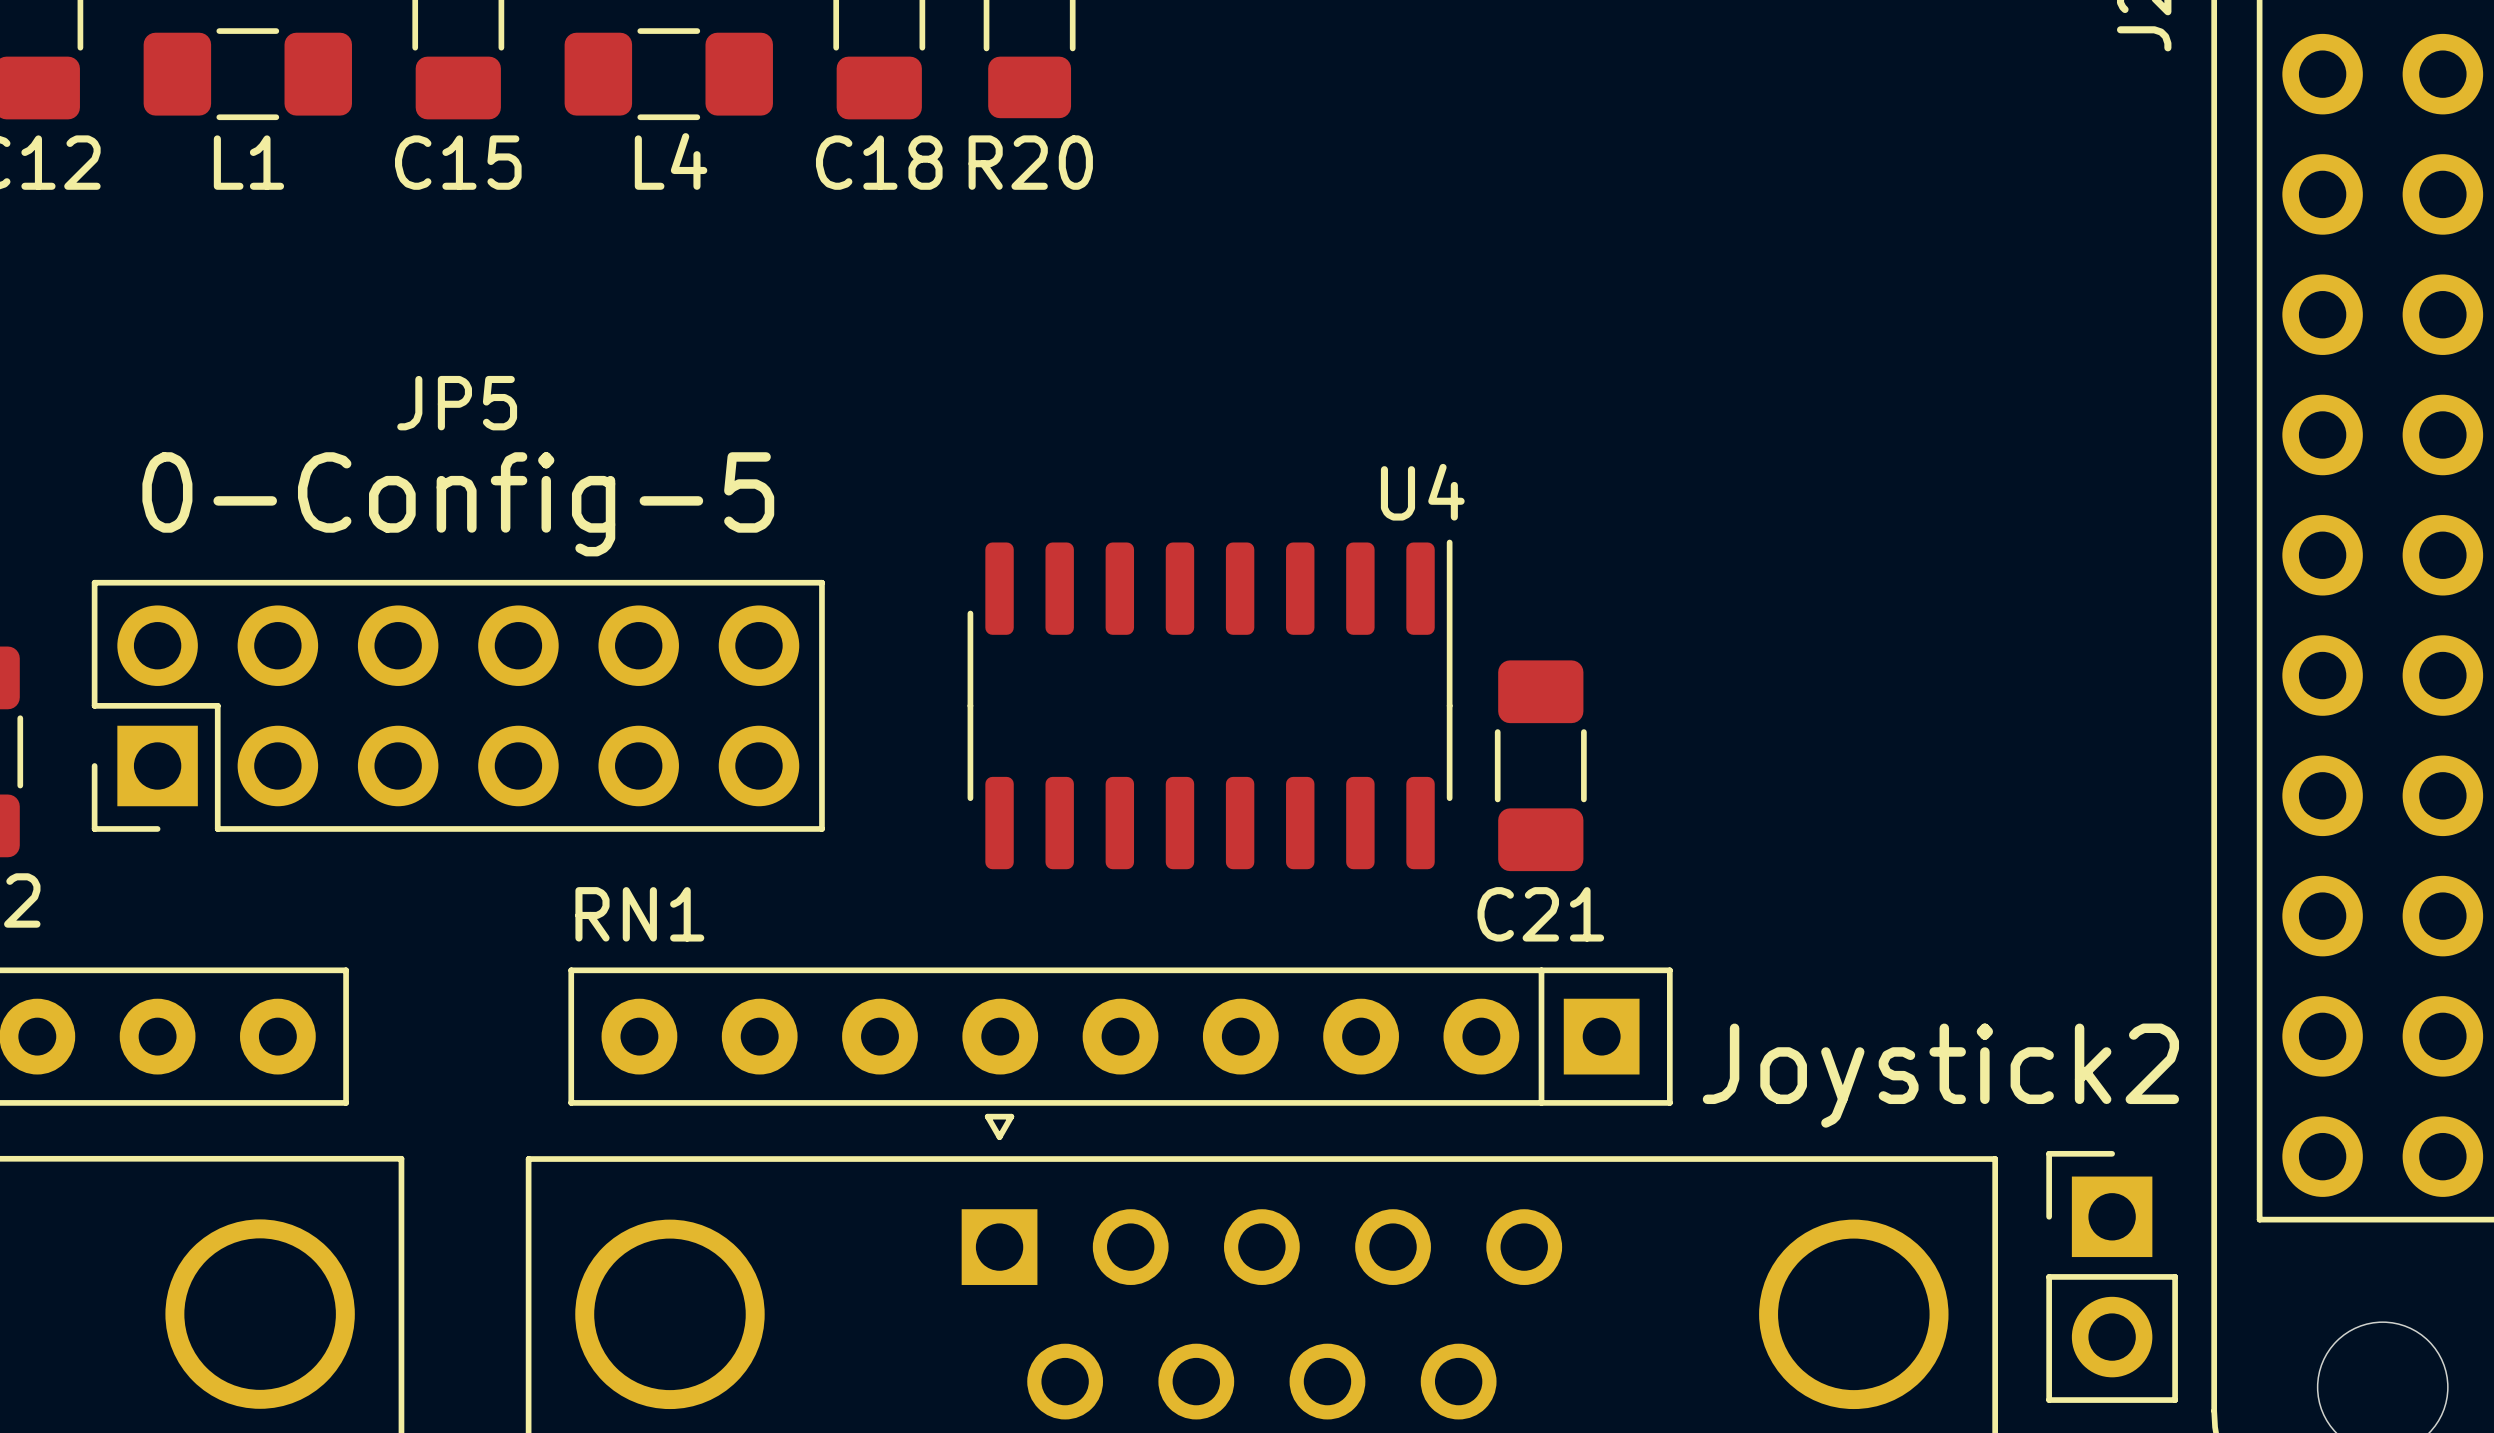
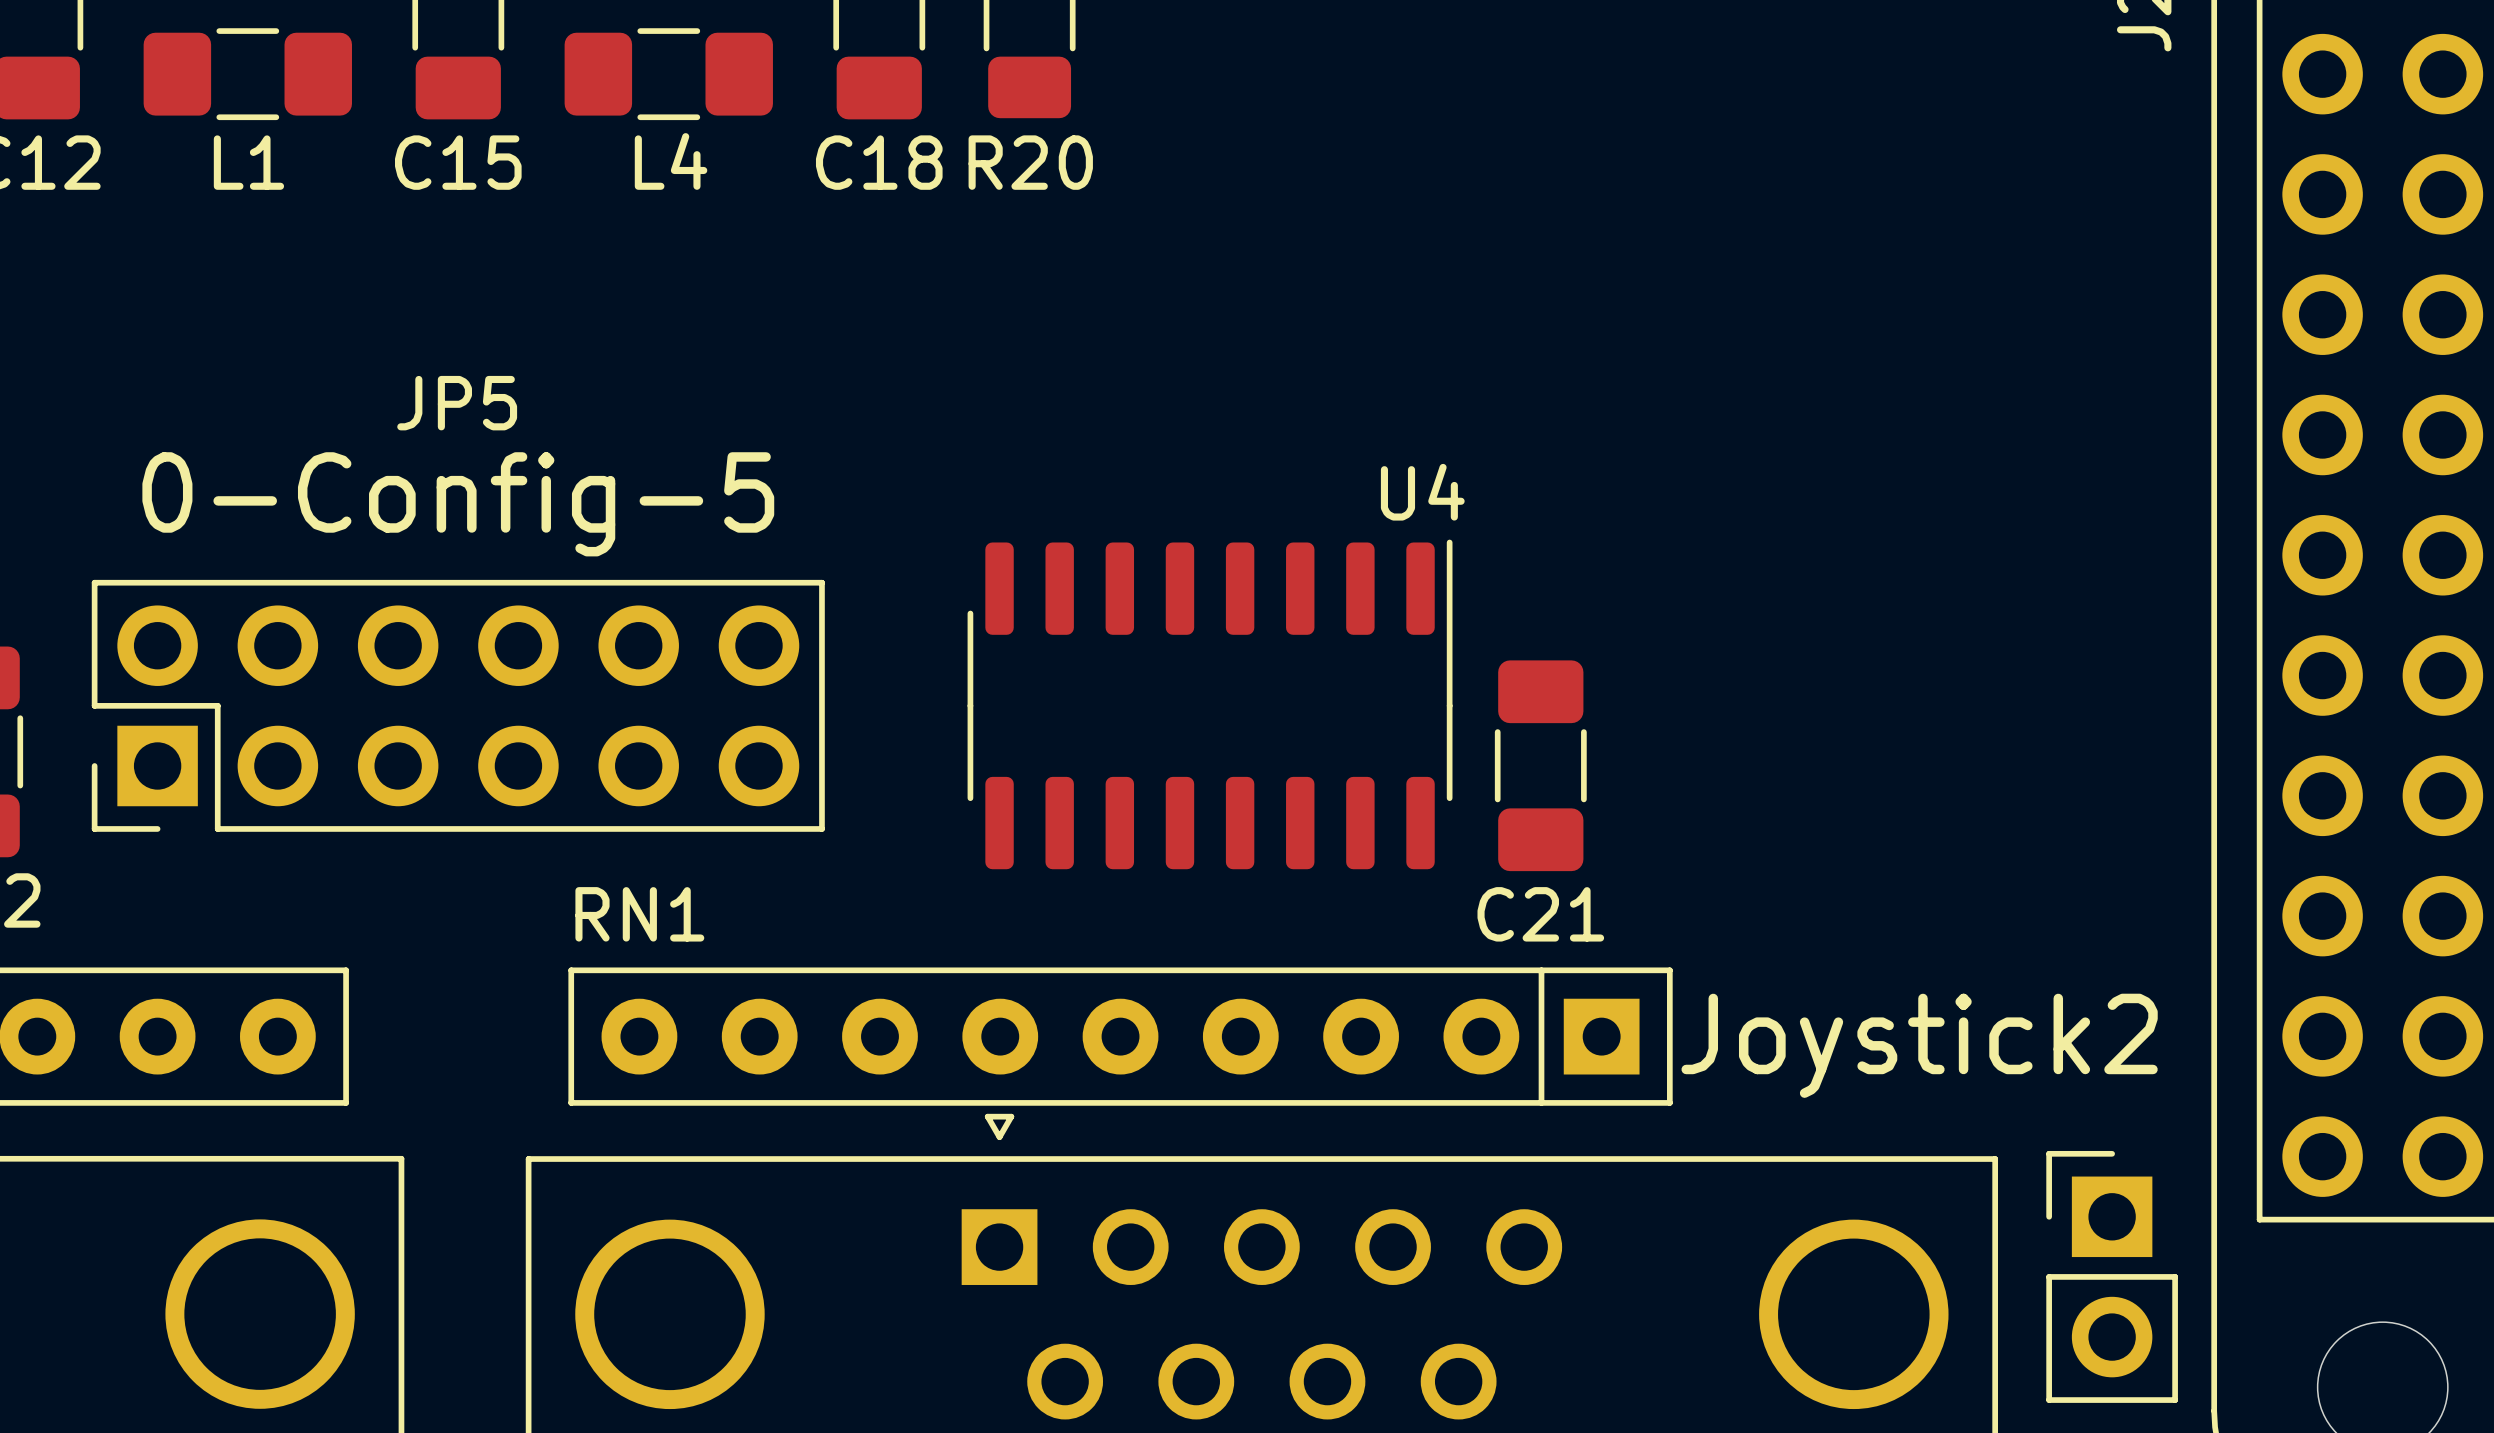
text position: Joystick2 (1940, 1075) -> Joystick2 (1919, 1045)

